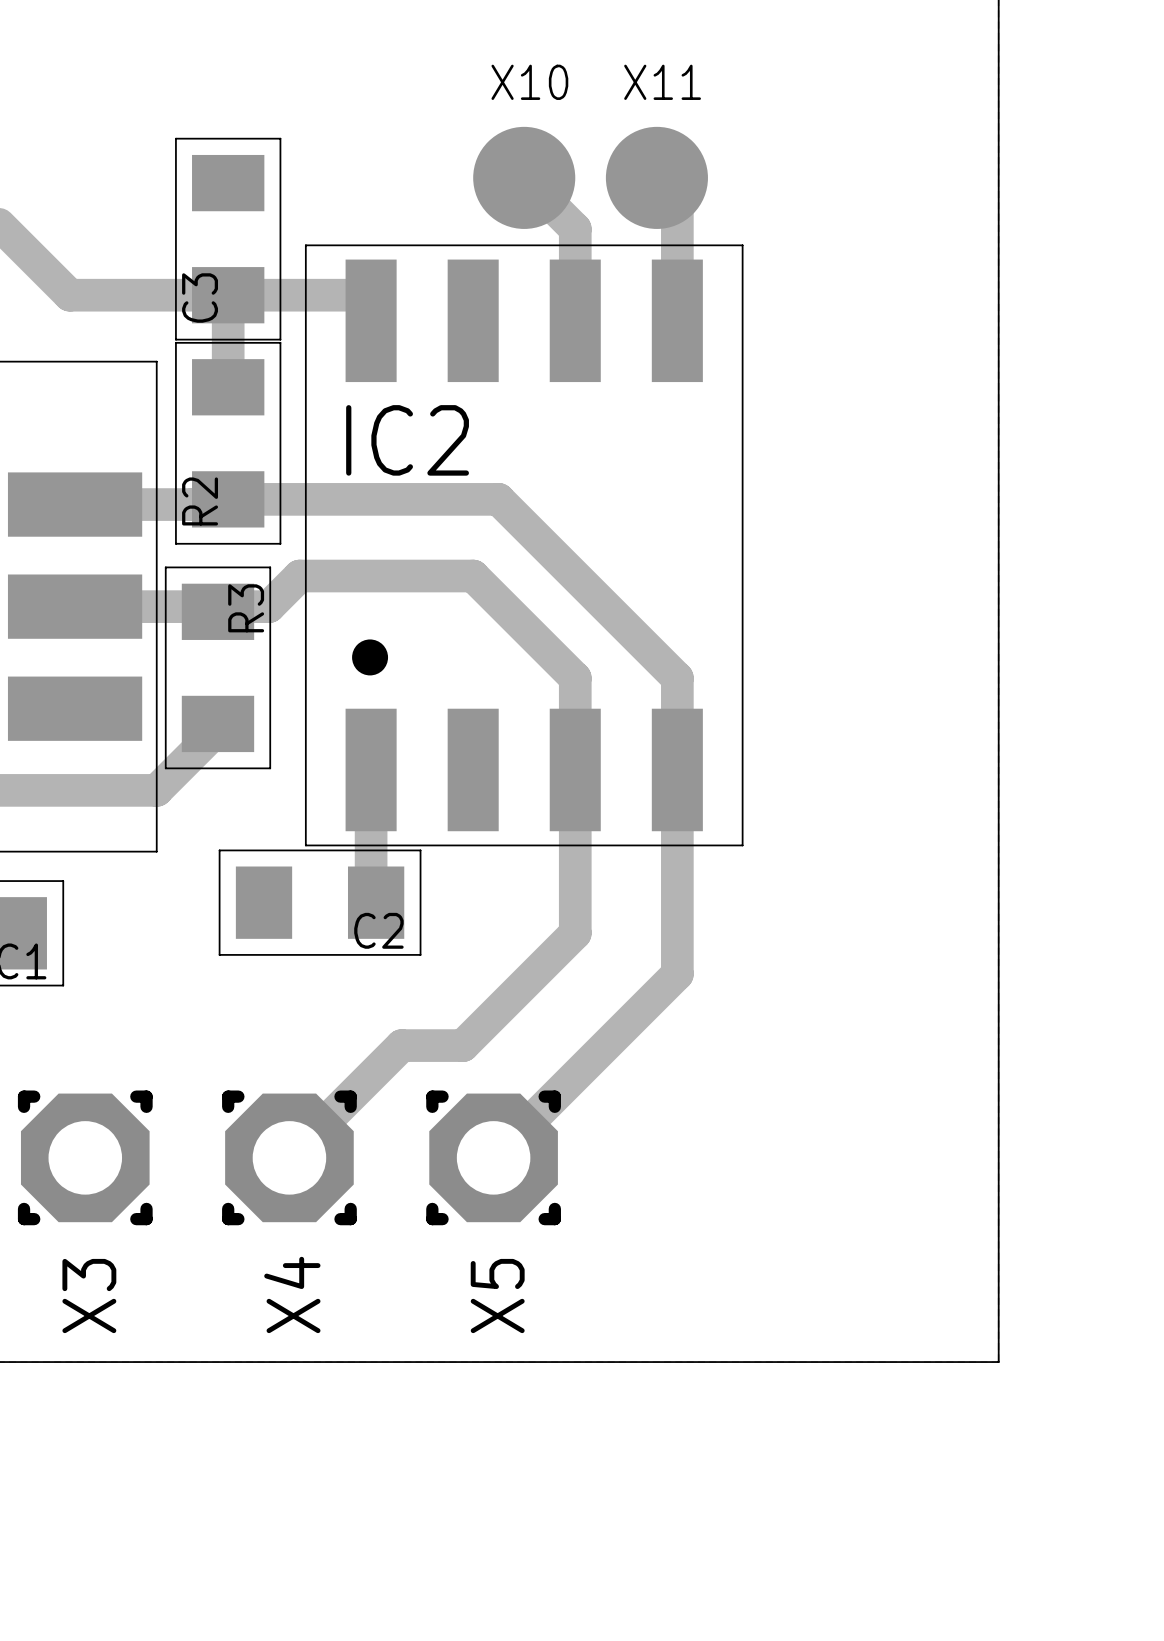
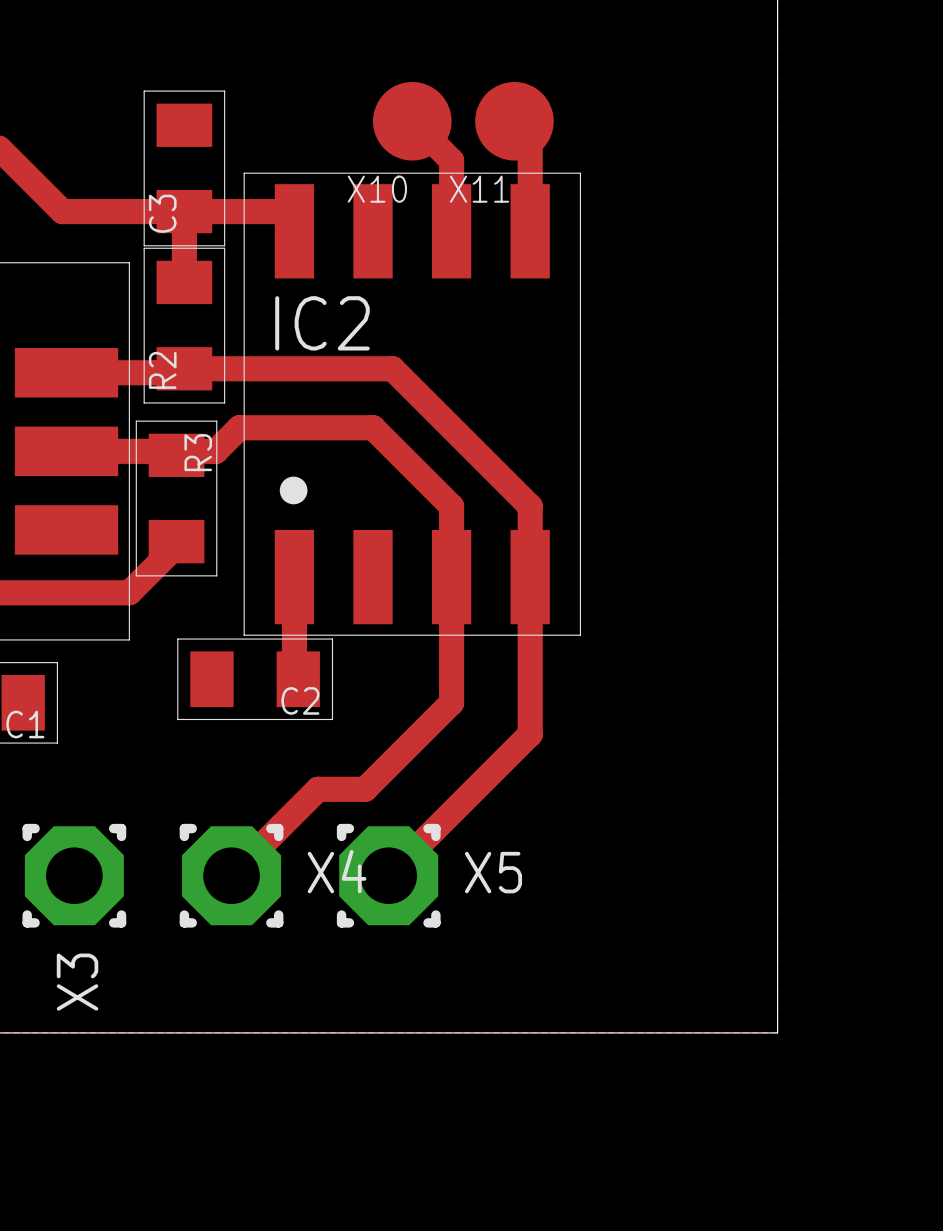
X10 name position: X10 (529, 82) -> X10 (377, 189)
X11 name position: X11 (662, 82) -> X11 (479, 189)
X4 name rotation: 0° (292, 1294) -> 90° clockwise (337, 871)
X4 name position: X4 (292, 1294) -> X4 (337, 871)
X5 name rotation: 0° (497, 1296) -> 90° clockwise (493, 872)
X5 name position: X5 (497, 1296) -> X5 (493, 872)

